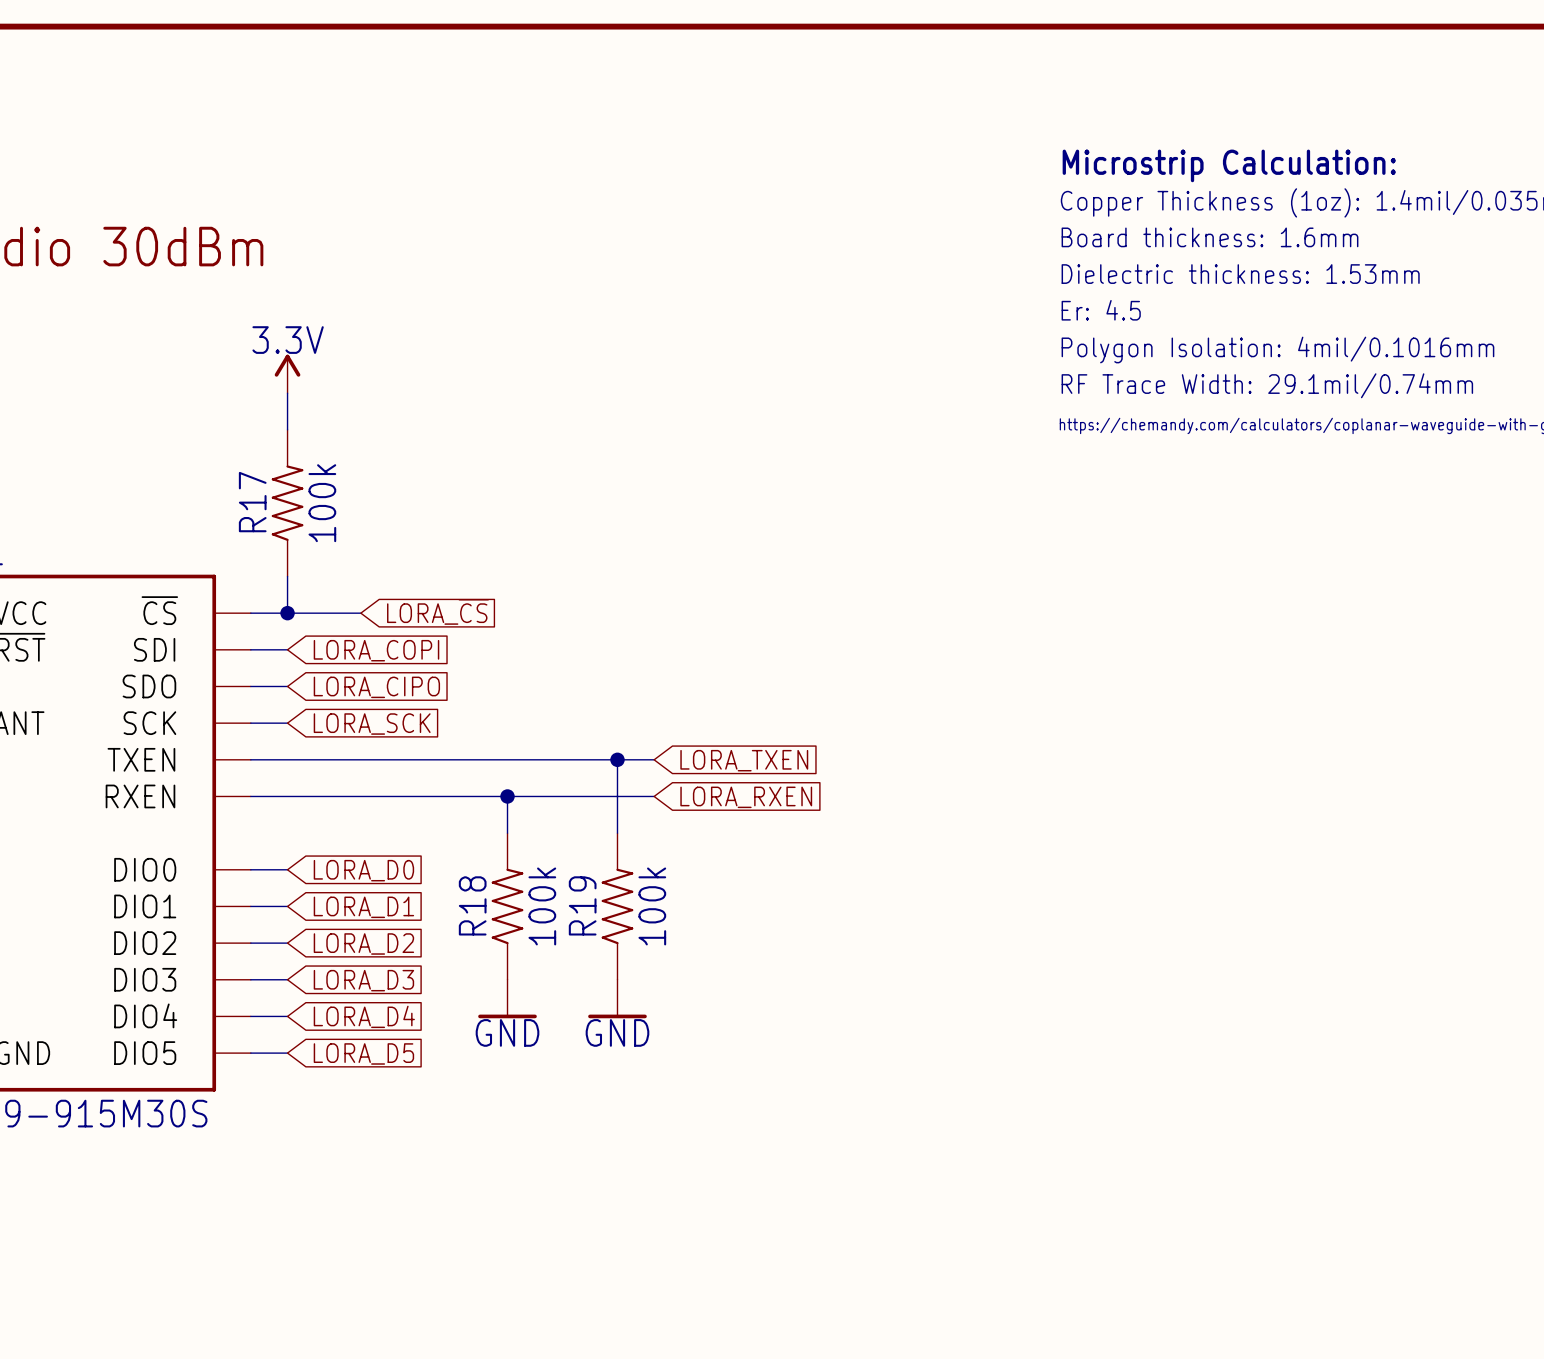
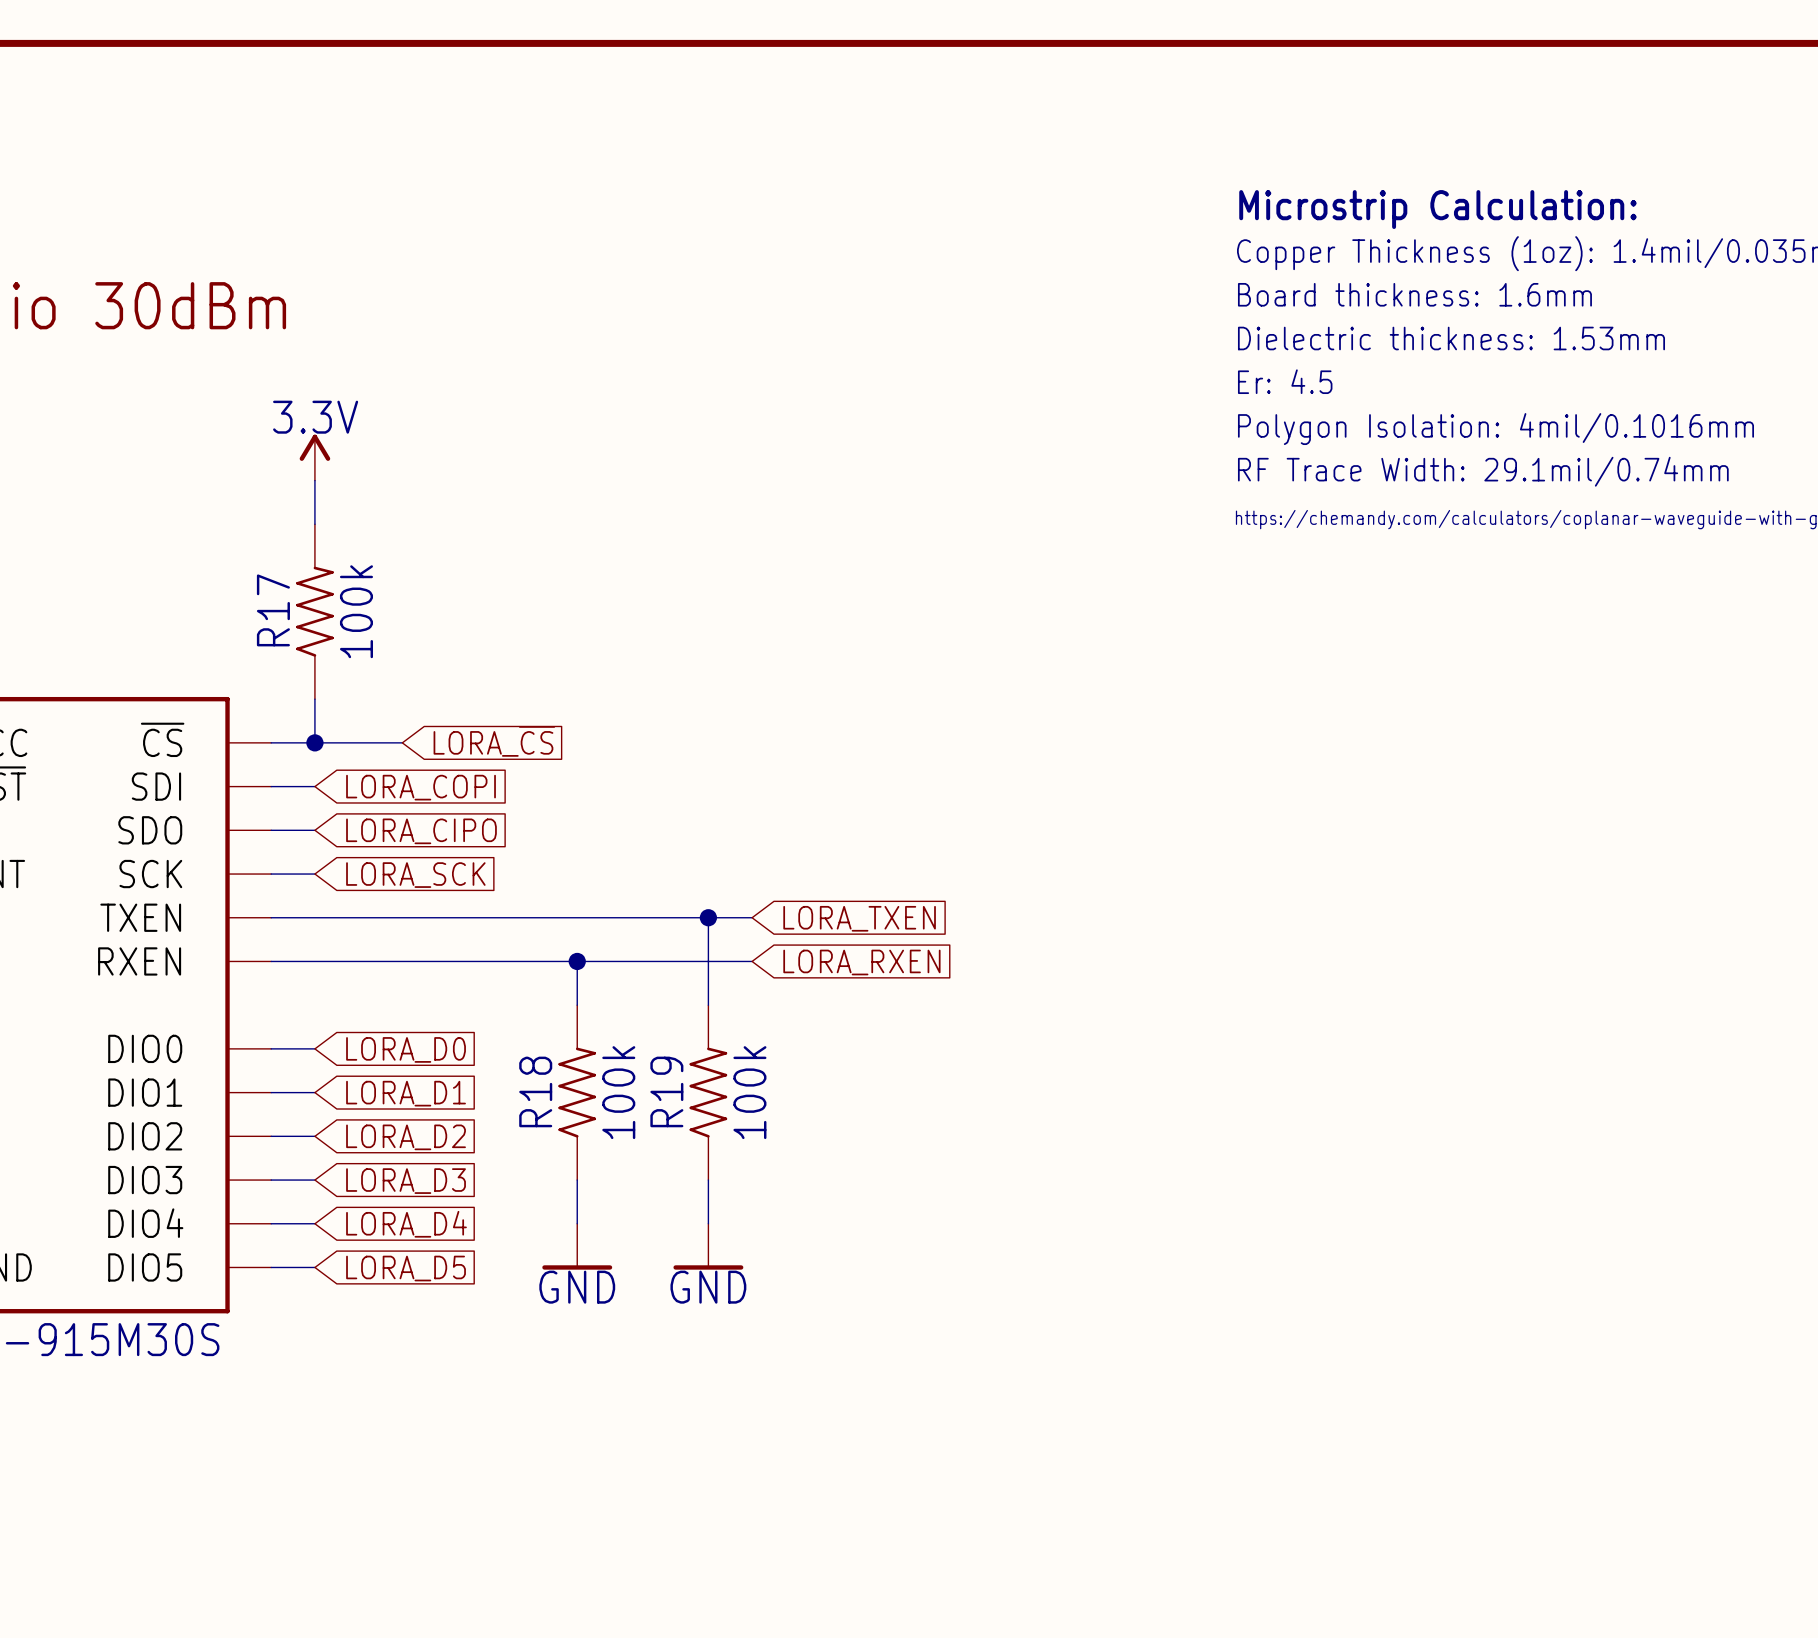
power symbol position: GND (507, 999) -> GND (577, 1246)
power symbol position: GND (617, 999) -> GND (708, 1246)

